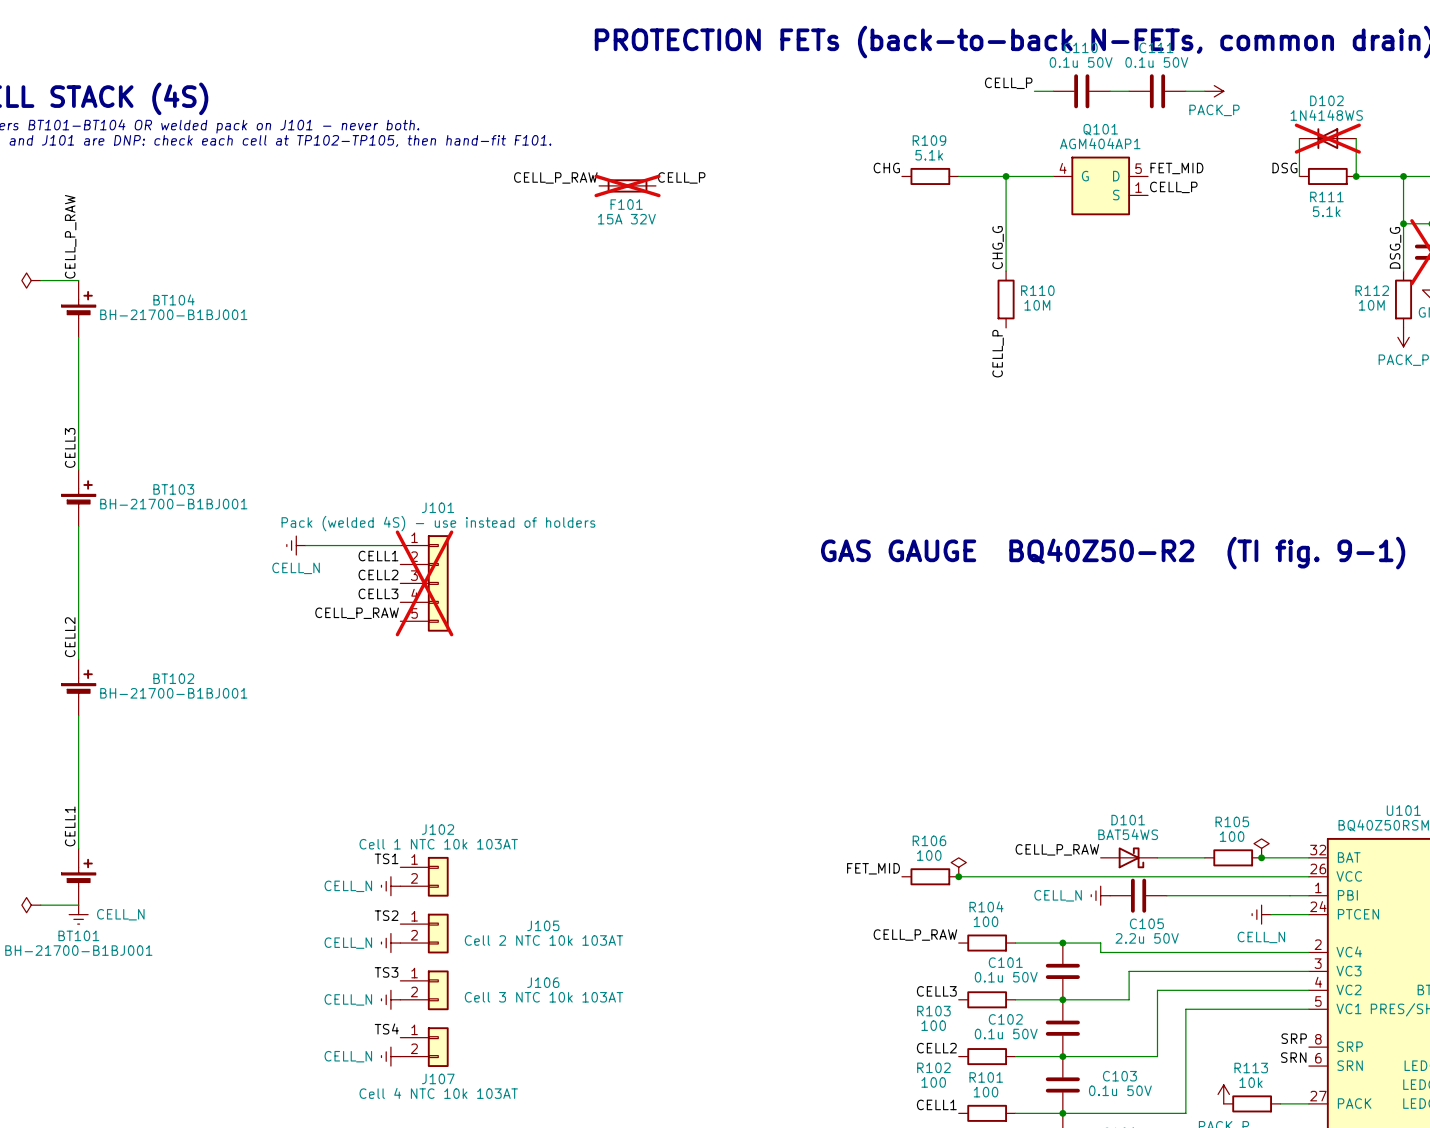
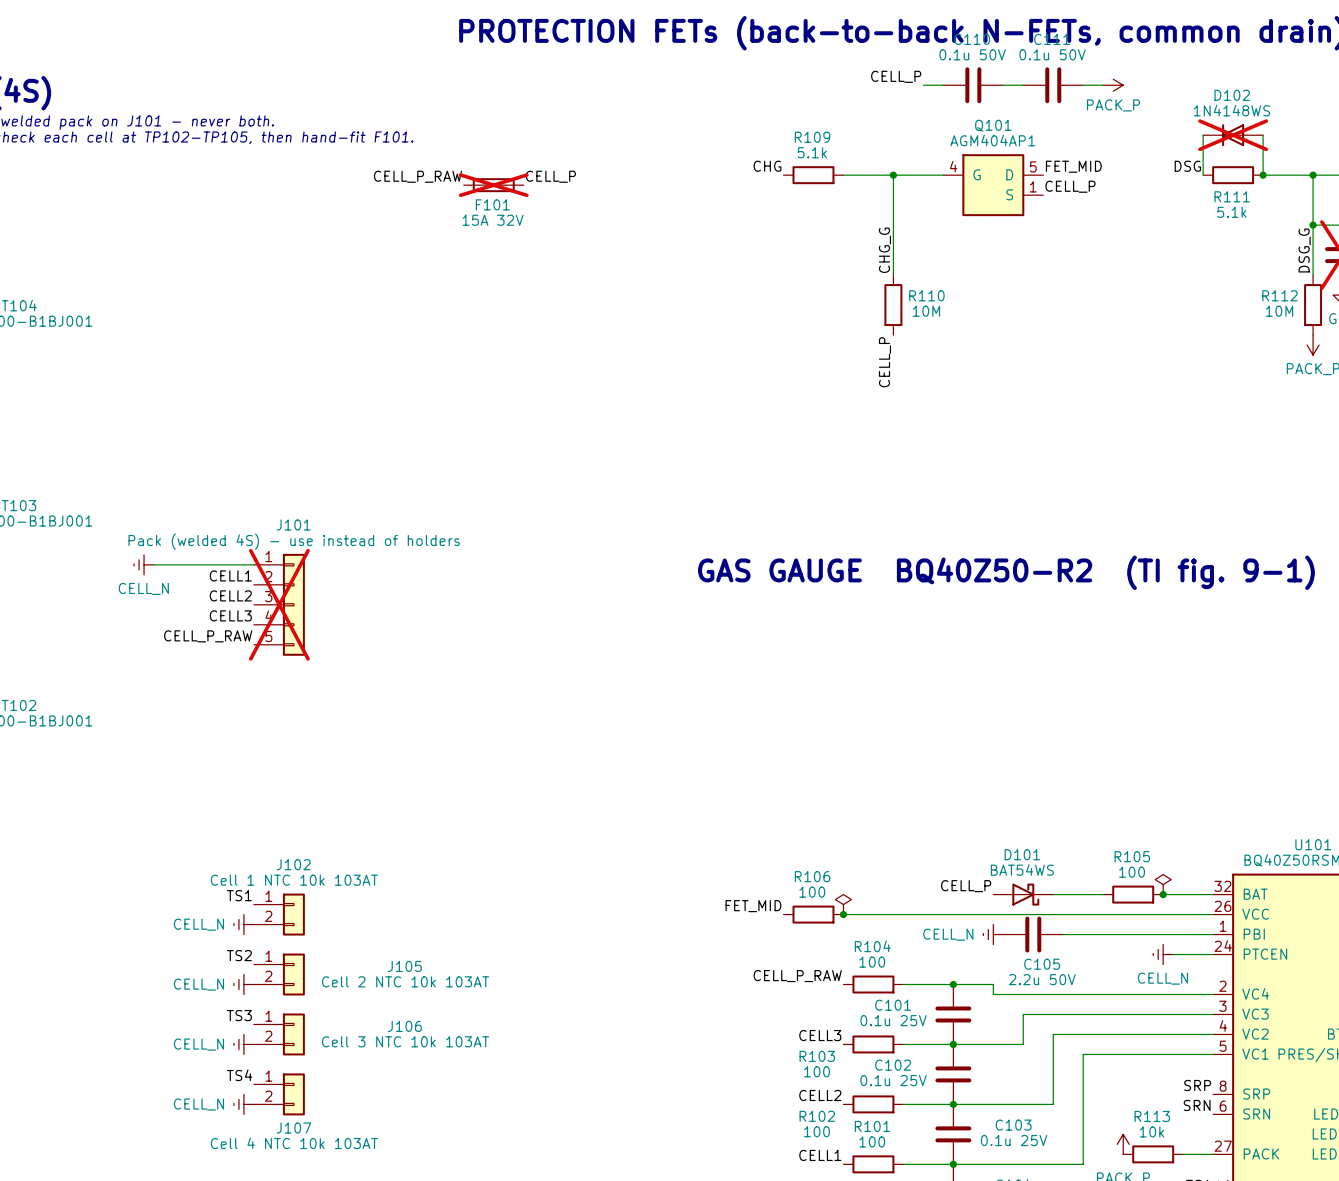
label: CELL_P_RAW (1057, 849) -> CELL_P (966, 886)
C101 value: 0.1u 50V (1006, 977) -> 0.1u 25V (893, 1020)
C102 value: 0.1u 50V (1006, 1034) -> 0.1u 25V (893, 1080)
C103 value: 0.1u 50V (1120, 1090) -> 0.1u 25V (1014, 1140)

